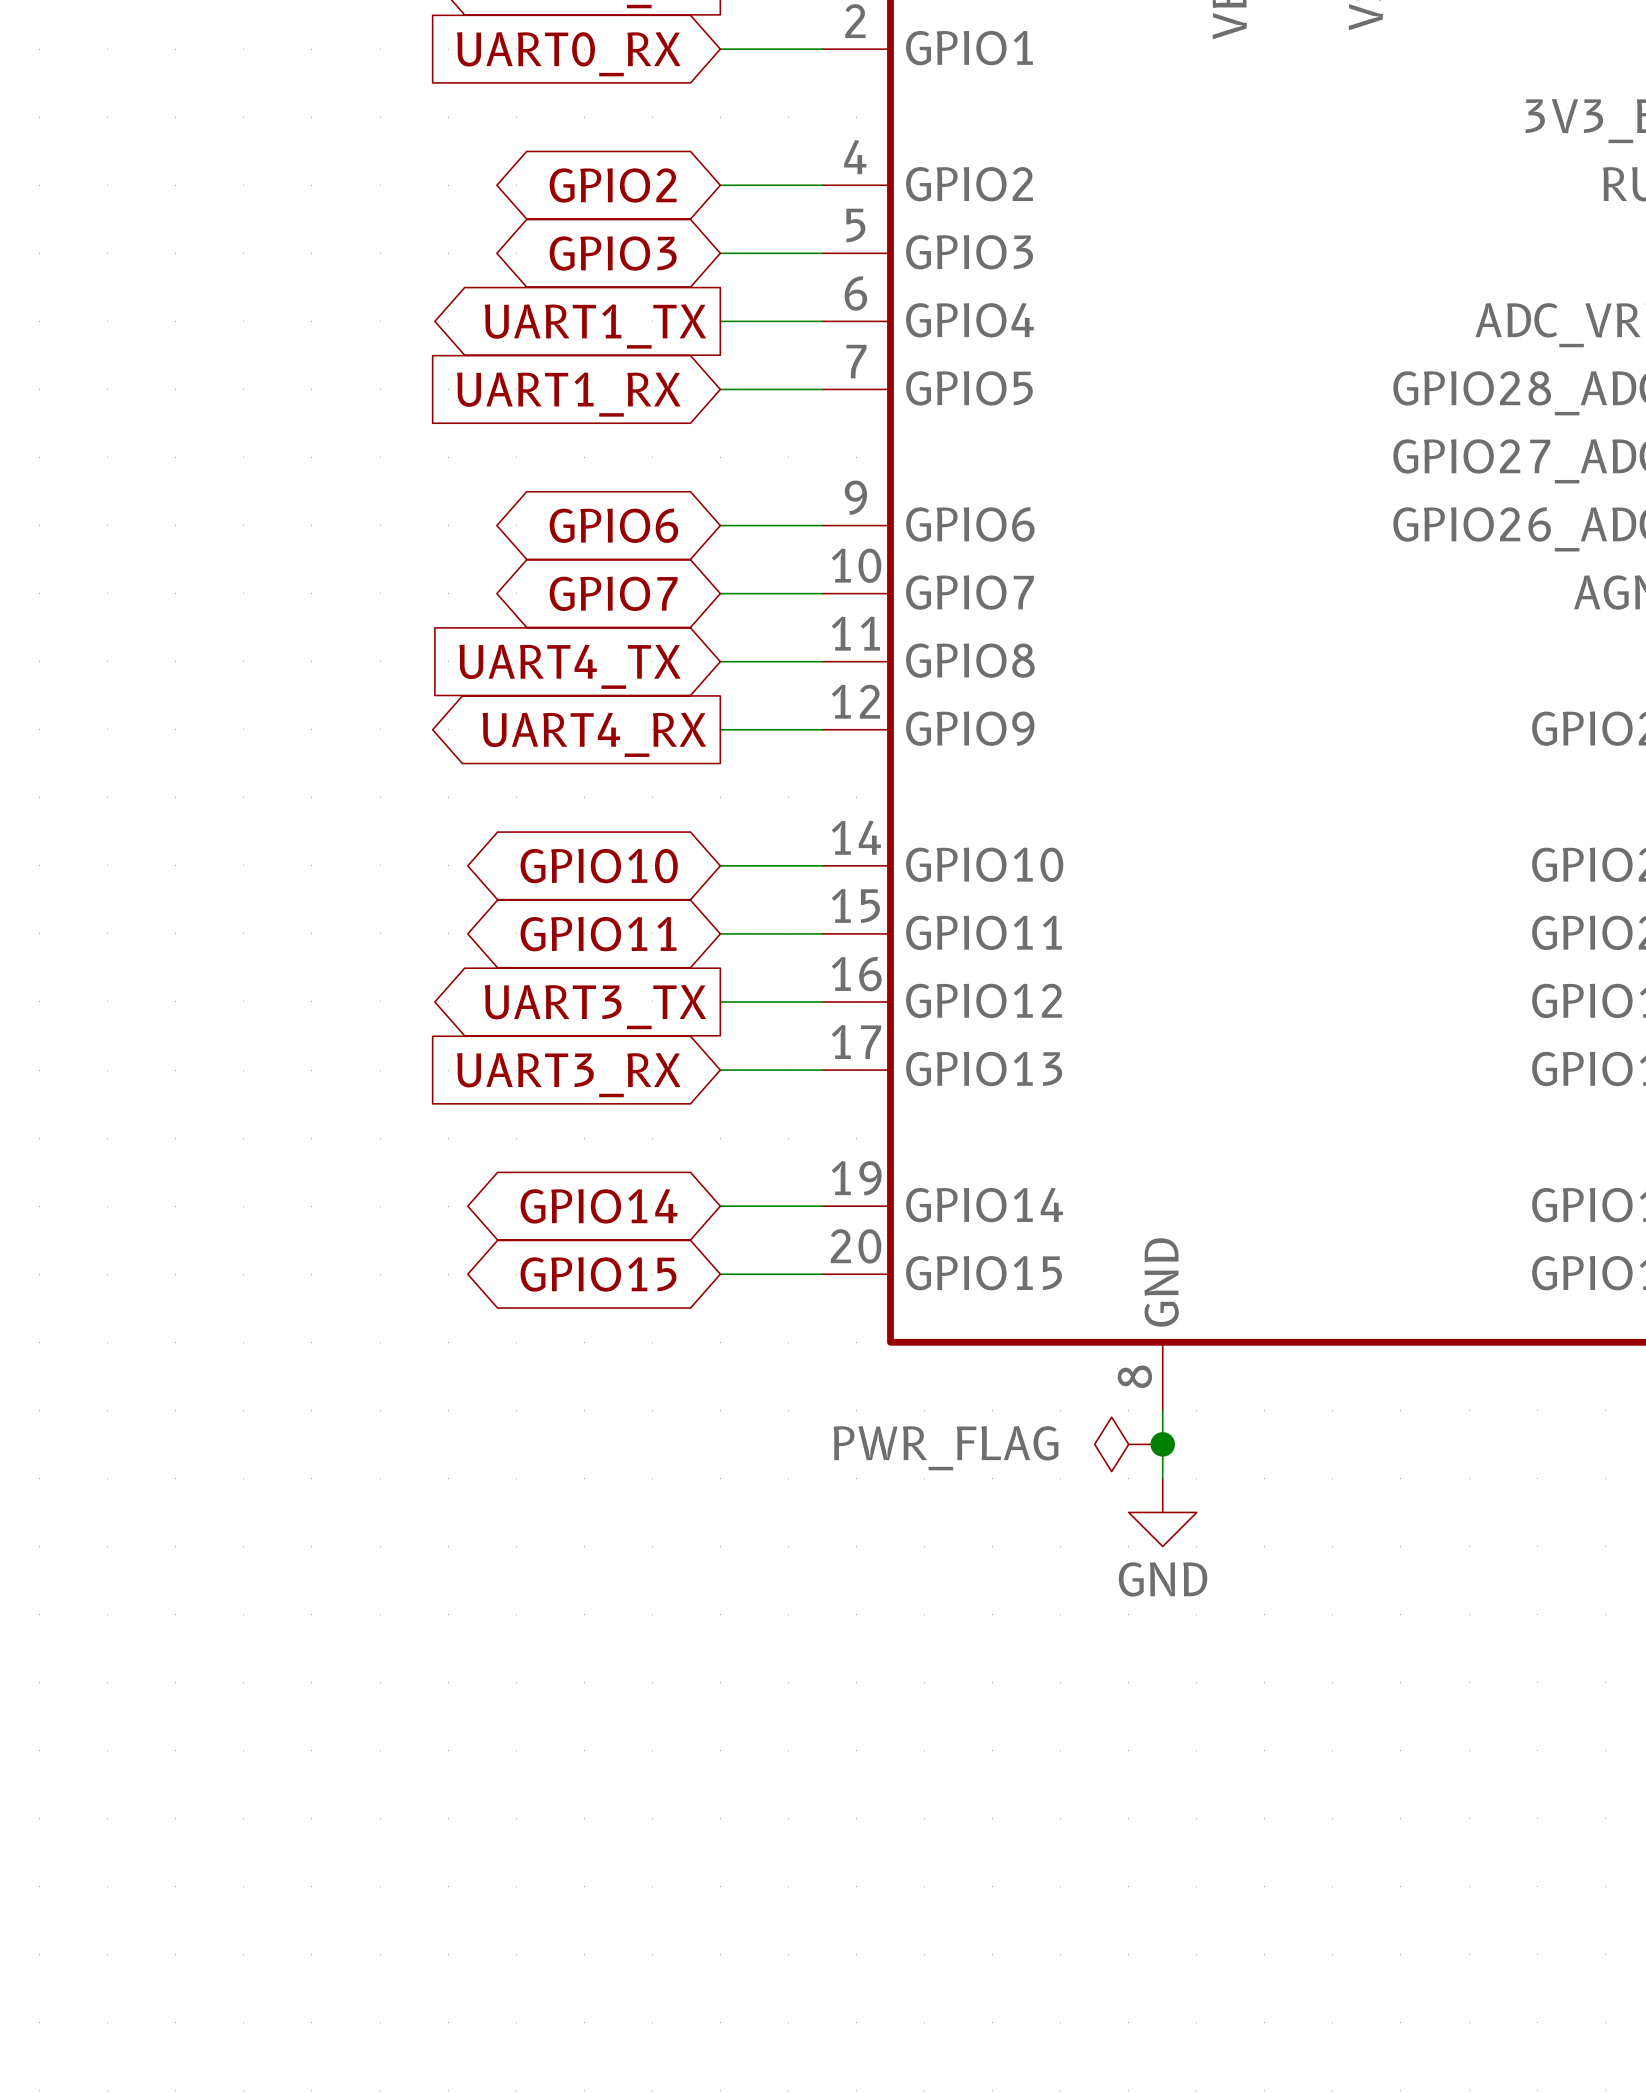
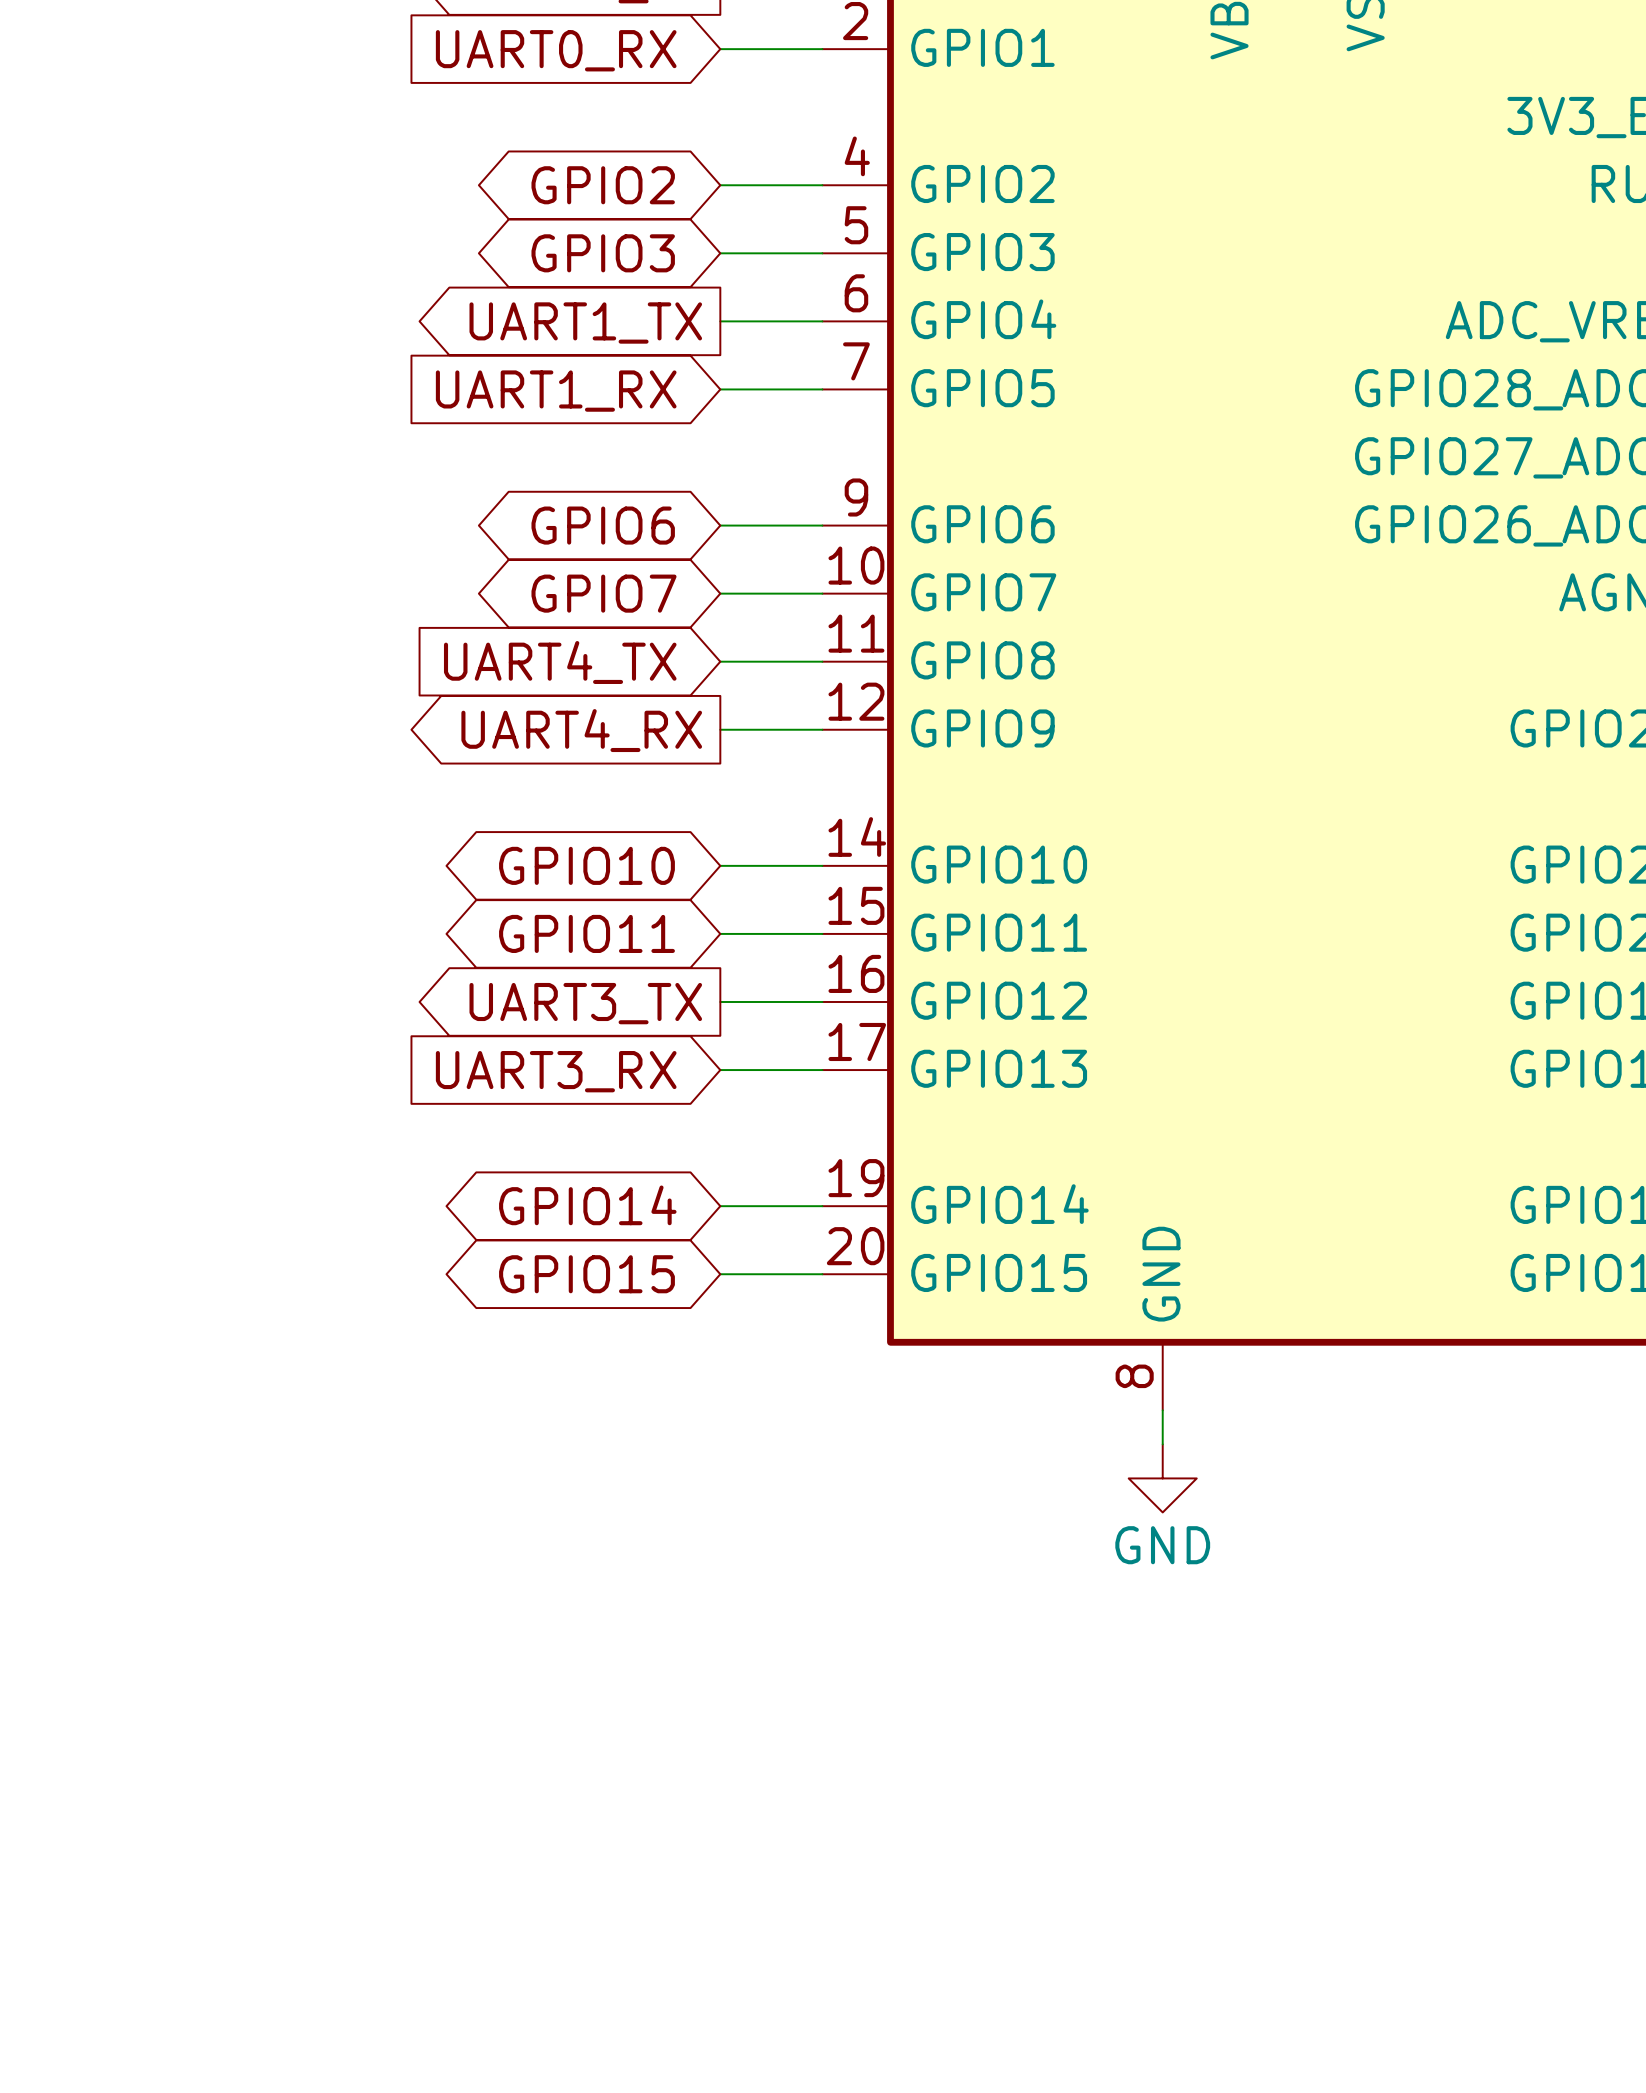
power symbol: PWR_FLAG (1128, 1444) -> none
junction: (1162, 1444) -> none
power symbol position: GND (1162, 1512) -> GND (1162, 1478)

